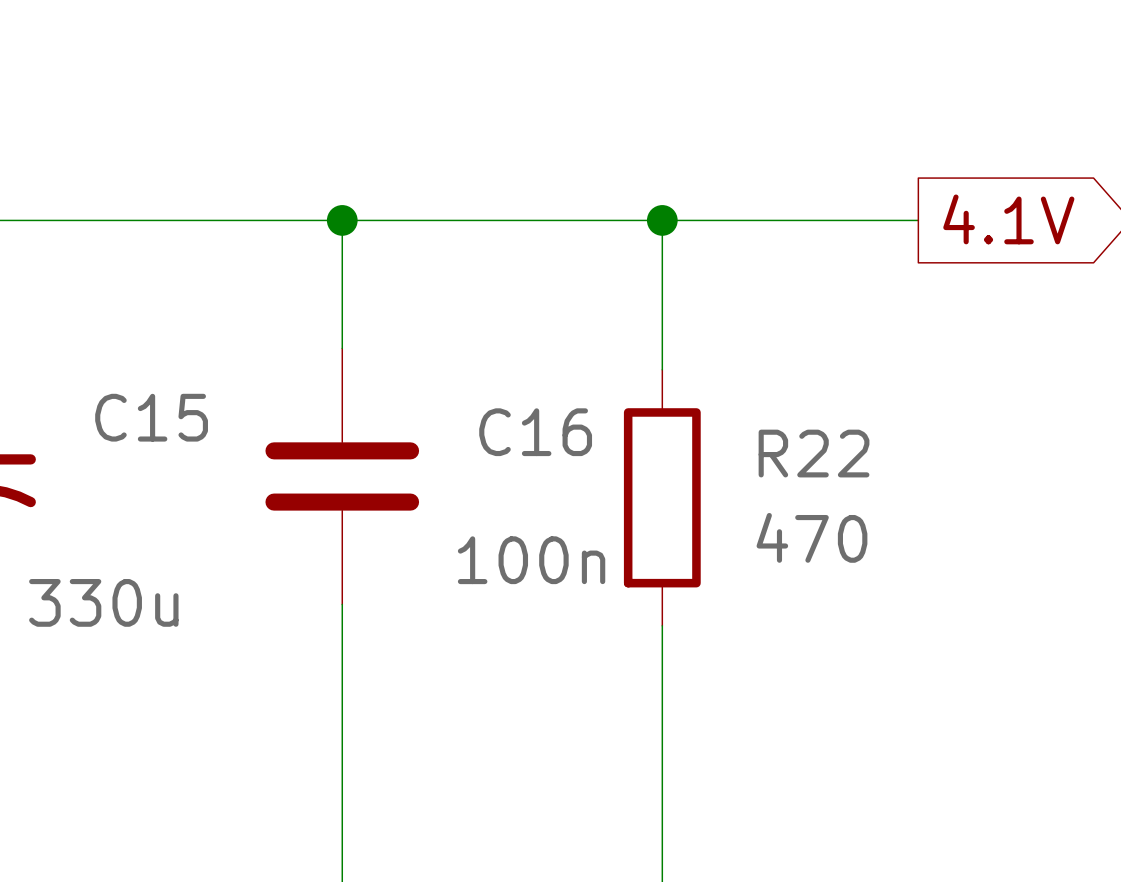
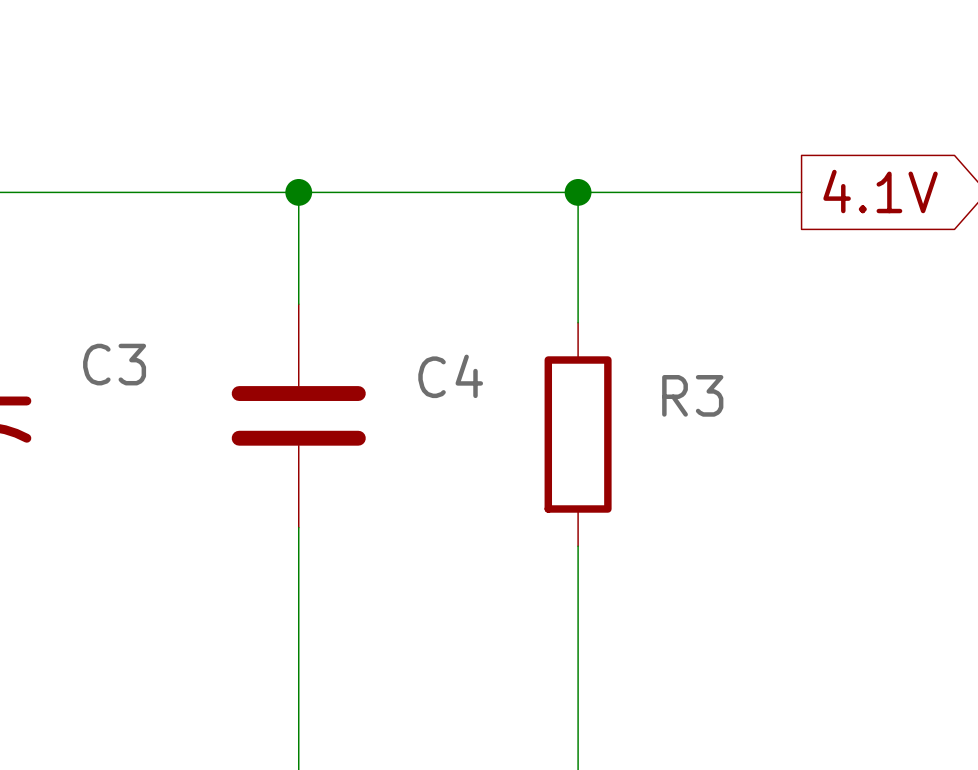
C15 name: C15 (151, 417) -> C3 (114, 364)
C16 name: C16 (535, 432) -> C4 (450, 376)
R22 name: R22 (814, 453) -> R3 (692, 395)
R22 value: 470 (811, 537) -> none
C16 value: 100n (531, 560) -> none
C15 value: 330u (103, 602) -> none

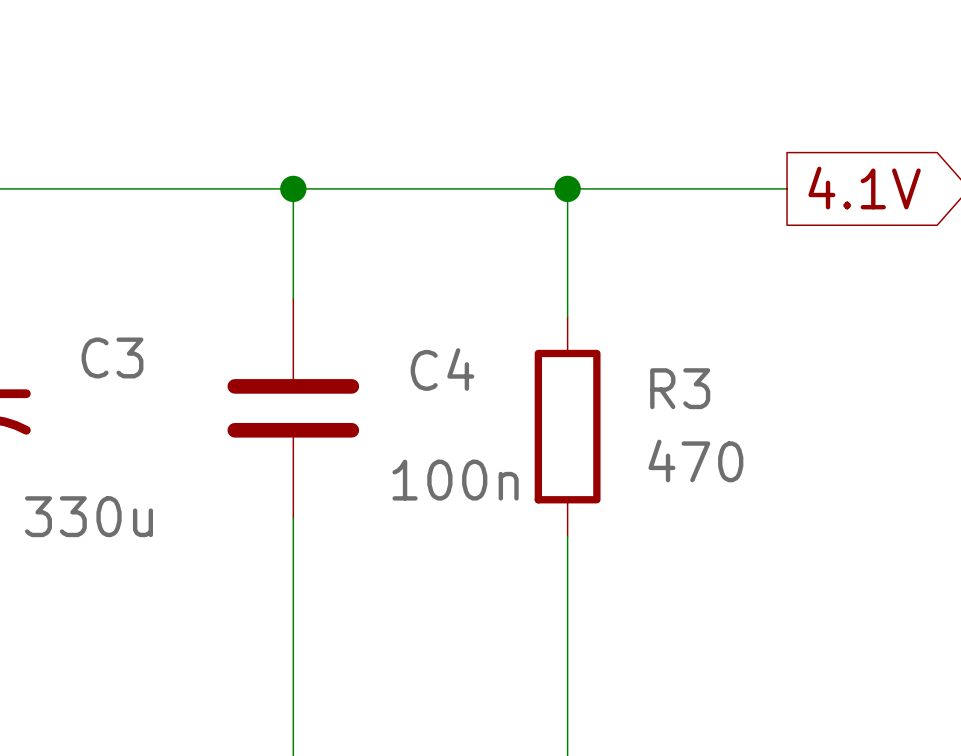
R3 value: none -> 470 (695, 460)
C4 value: none -> 100n (455, 480)
C3 value: none -> 330u (88, 516)

